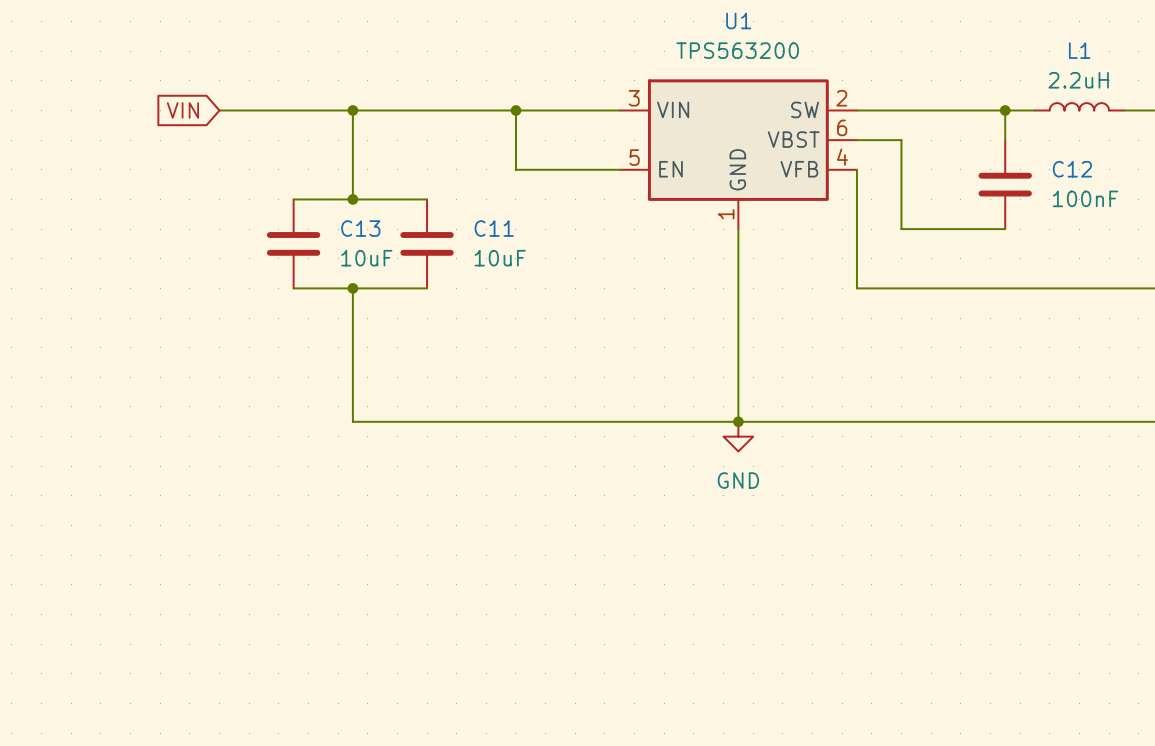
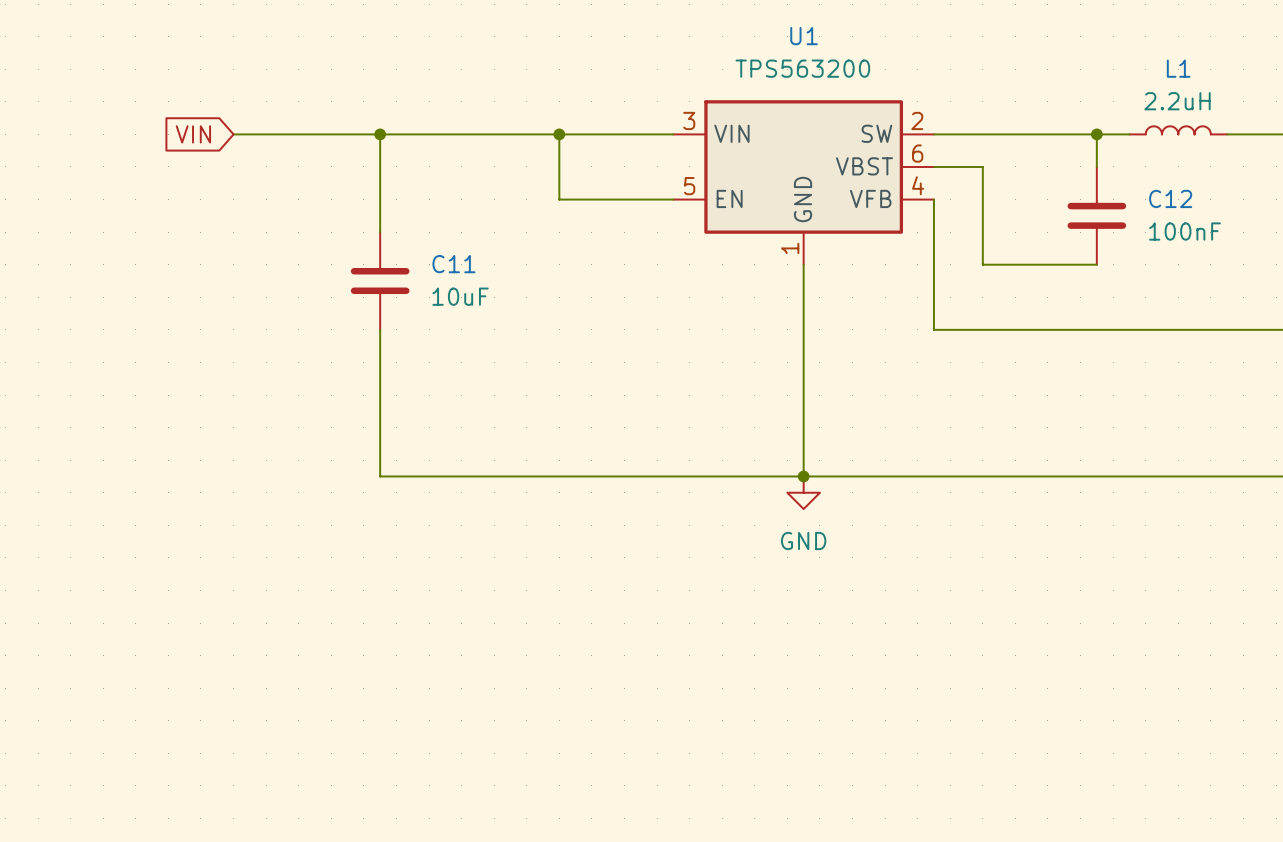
wire: (293, 199) (427, 199) -> none
junction: (352, 199) -> none
C13: 10uF (293, 243) -> none
C11 position: (427, 243) -> (380, 281)
wire: (293, 288) (427, 288) -> none
junction: (352, 288) -> none

